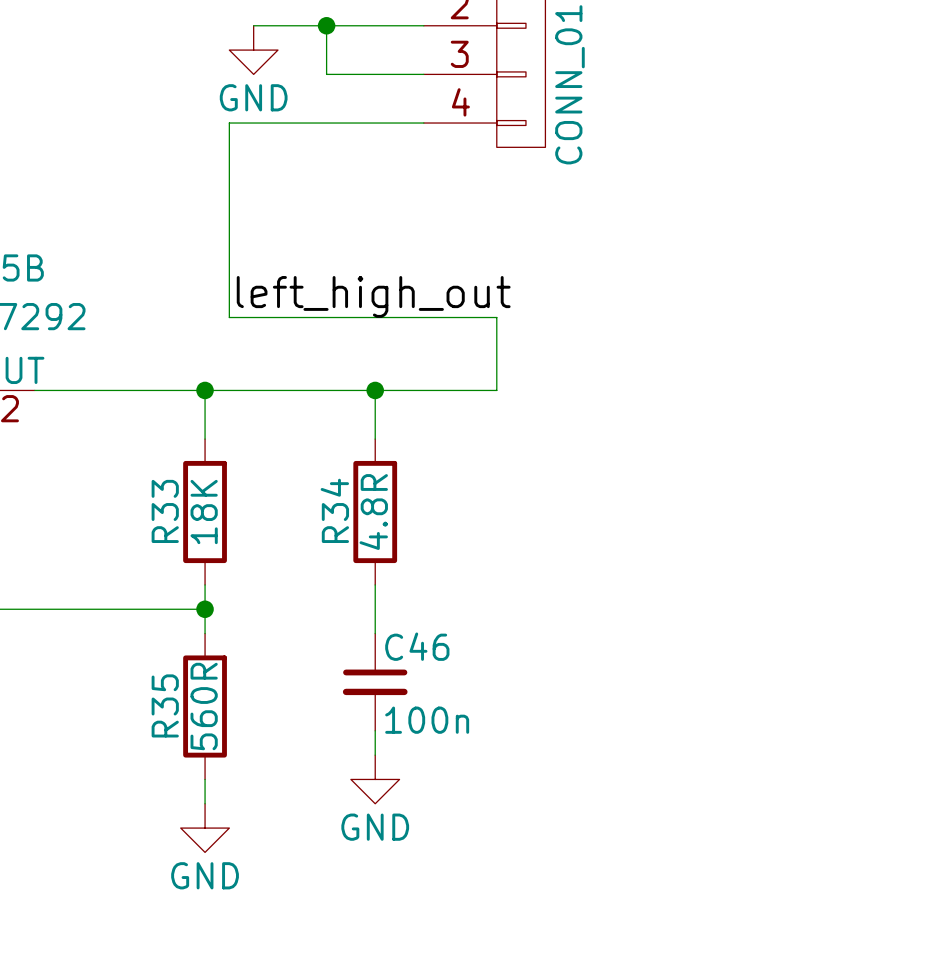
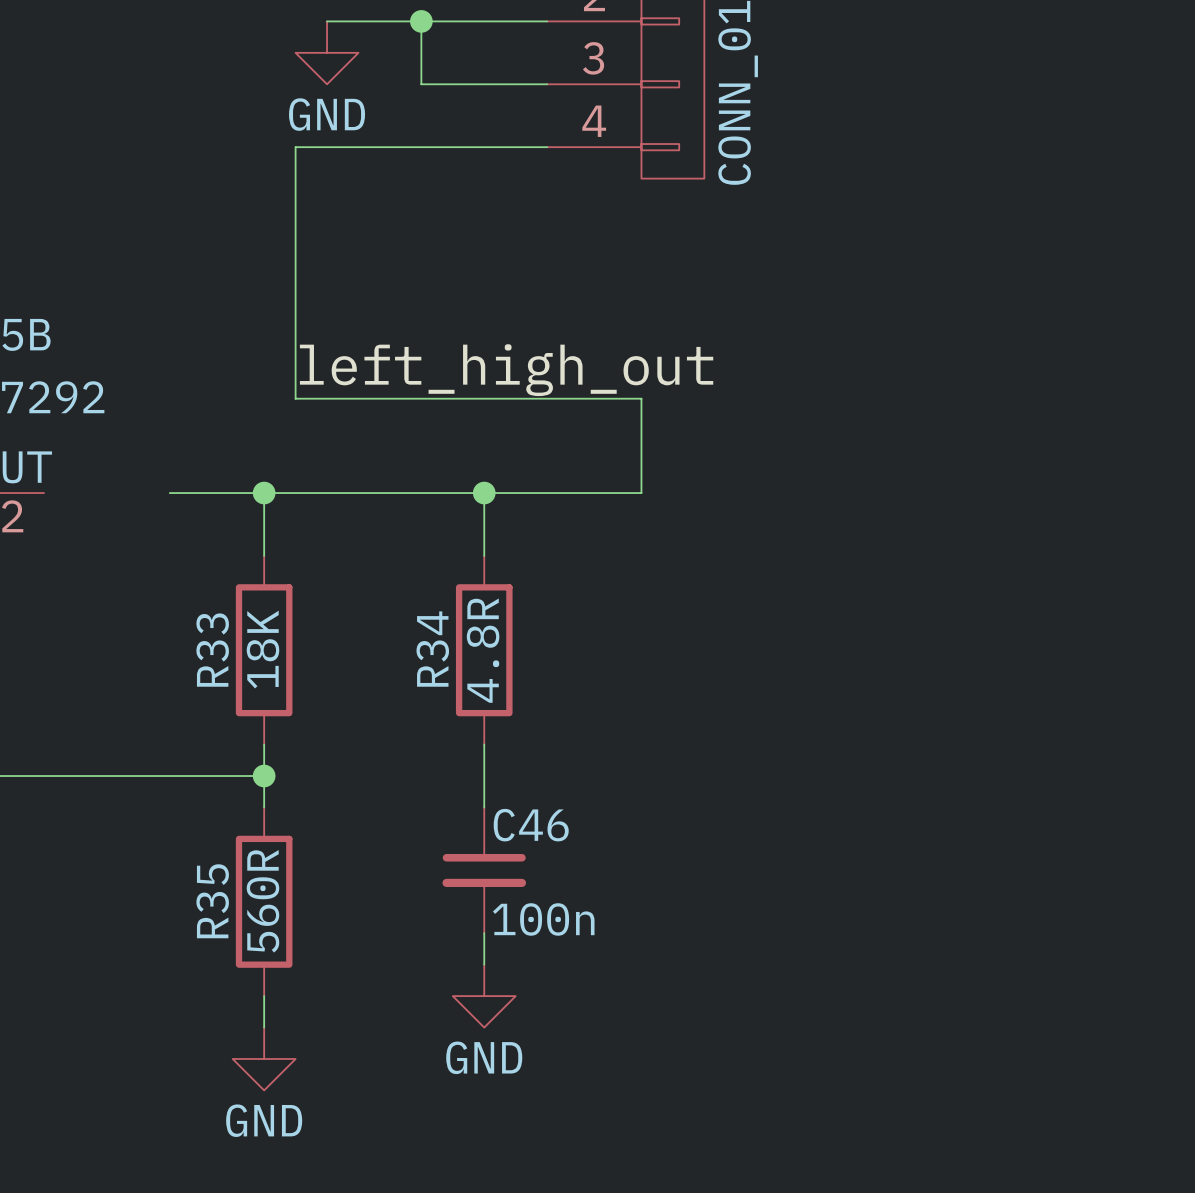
wire: (34, 390) (132, 390) -> none

